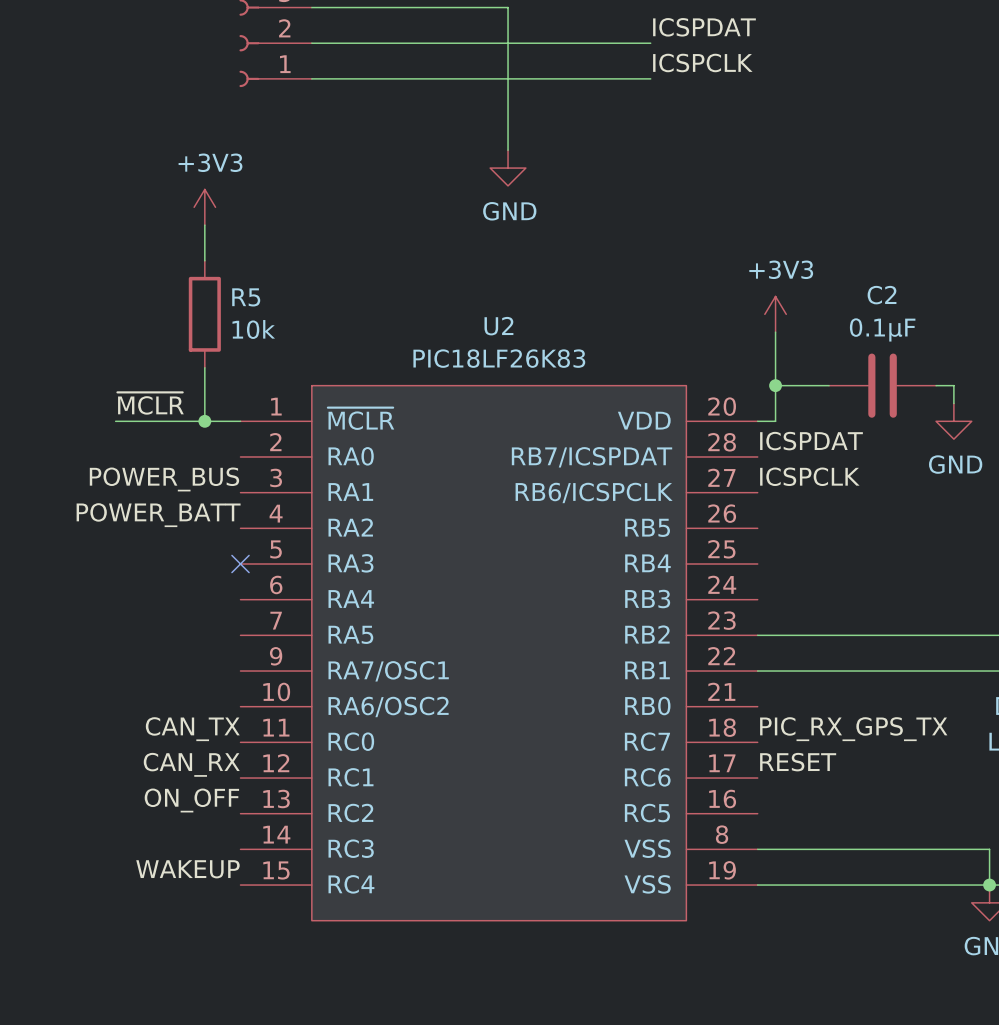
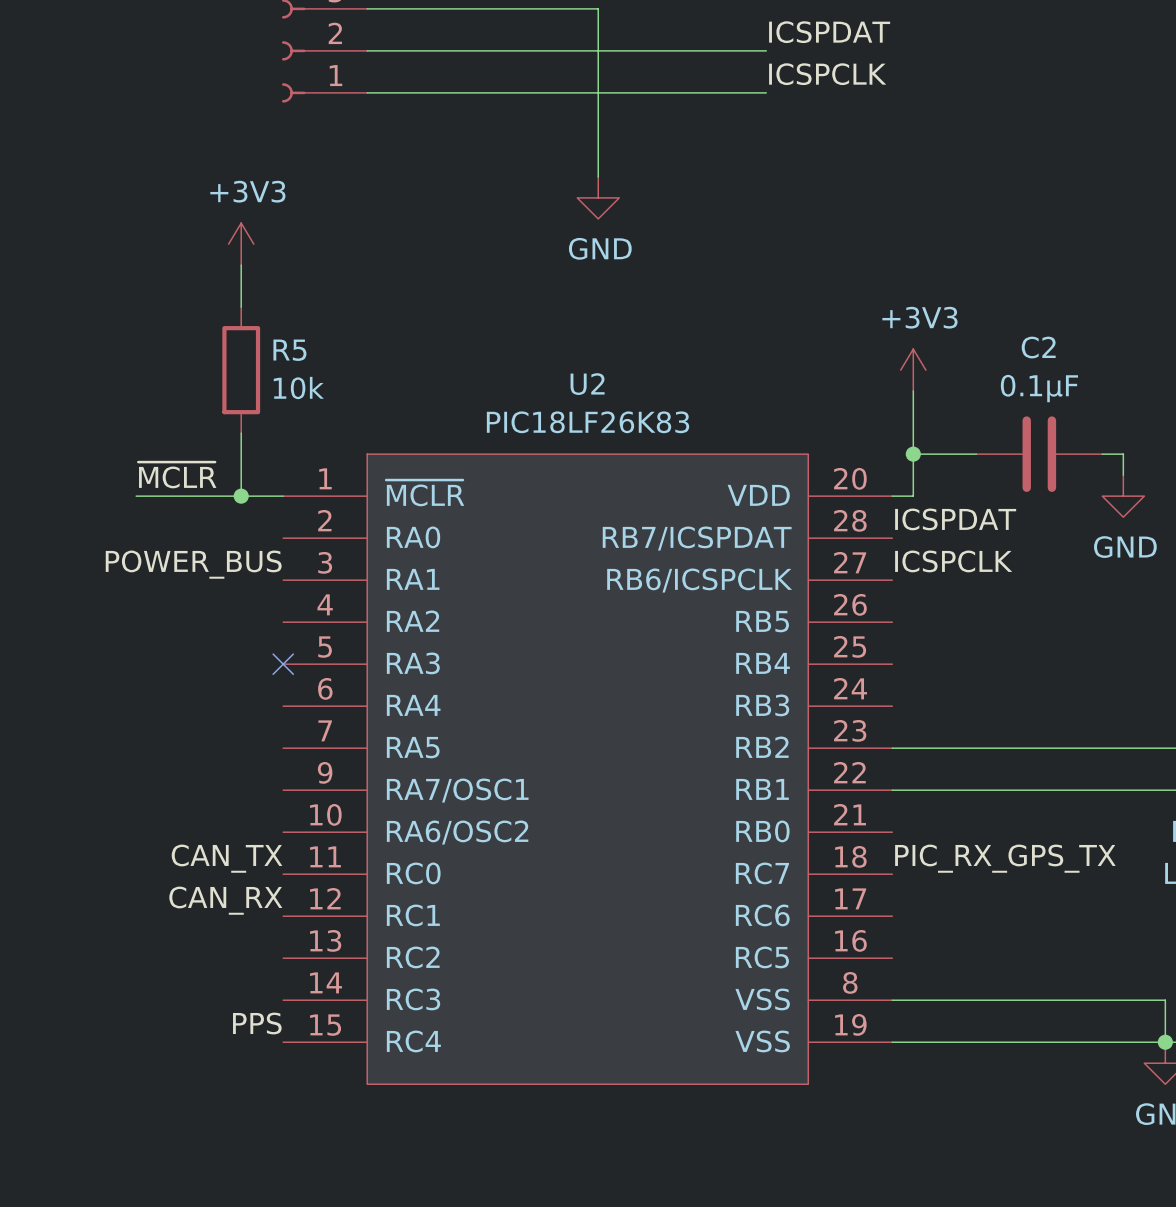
label: POWER_BATT (158, 515) -> none
label: RESET (798, 762) -> none
label: ON_OFF (191, 800) -> none
label: WAKEUP (187, 869) -> PPS (257, 1023)

